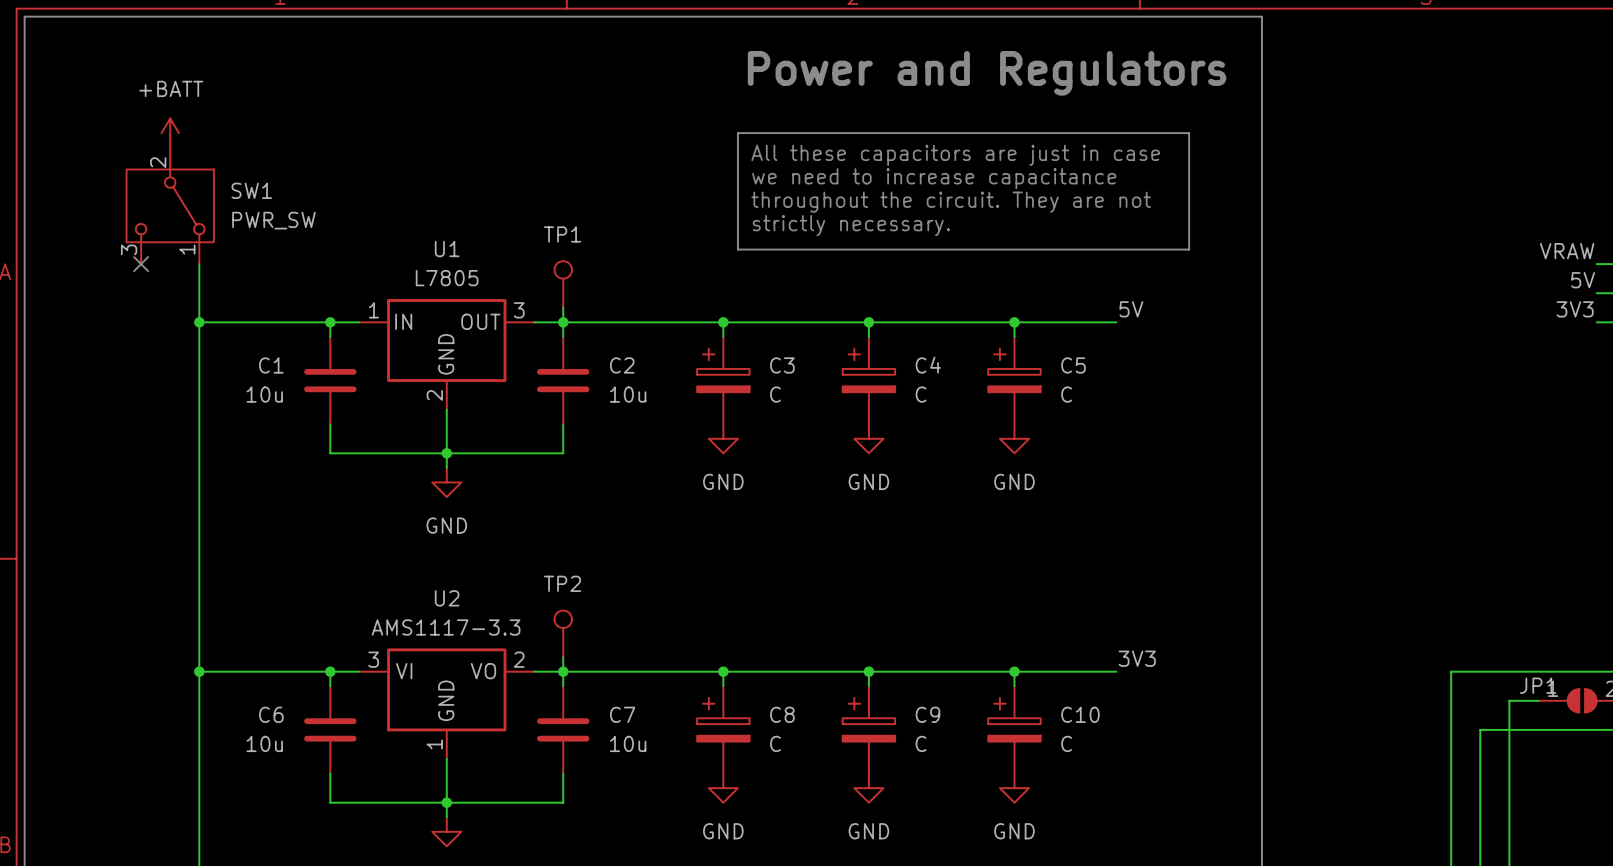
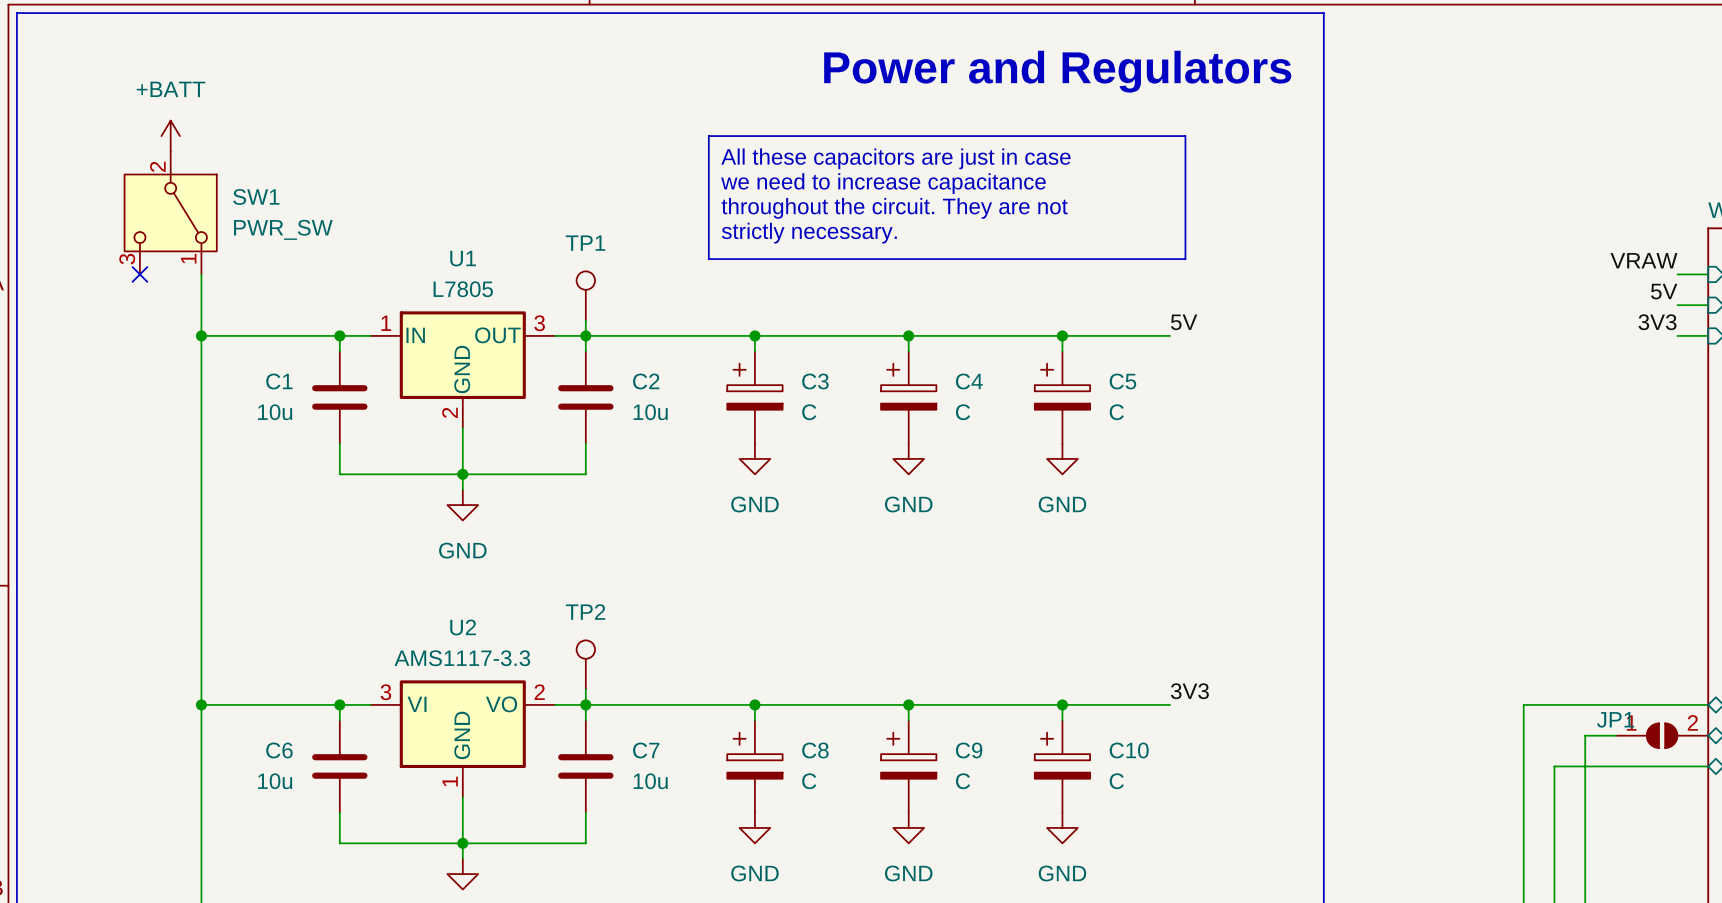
line: (737, 133) (737, 249) -> (770, 136) (708, 136) (708, 259) (770, 259)
line: (1130, 133) (1189, 133) (1189, 249) (1130, 249) -> (1185, 136) (1185, 259)
text position: All these capacitors are just in case (955, 155) -> All these capacitors are just in case (895, 158)
text position: we need to increase capacitance (934, 178) -> we need to increase capacitance (883, 183)
text position: throughout the circuit. They are not (951, 202) -> throughout the circuit. They are not (894, 208)
text position: strictly necessary. (851, 225) -> strictly necessary. (809, 233)

